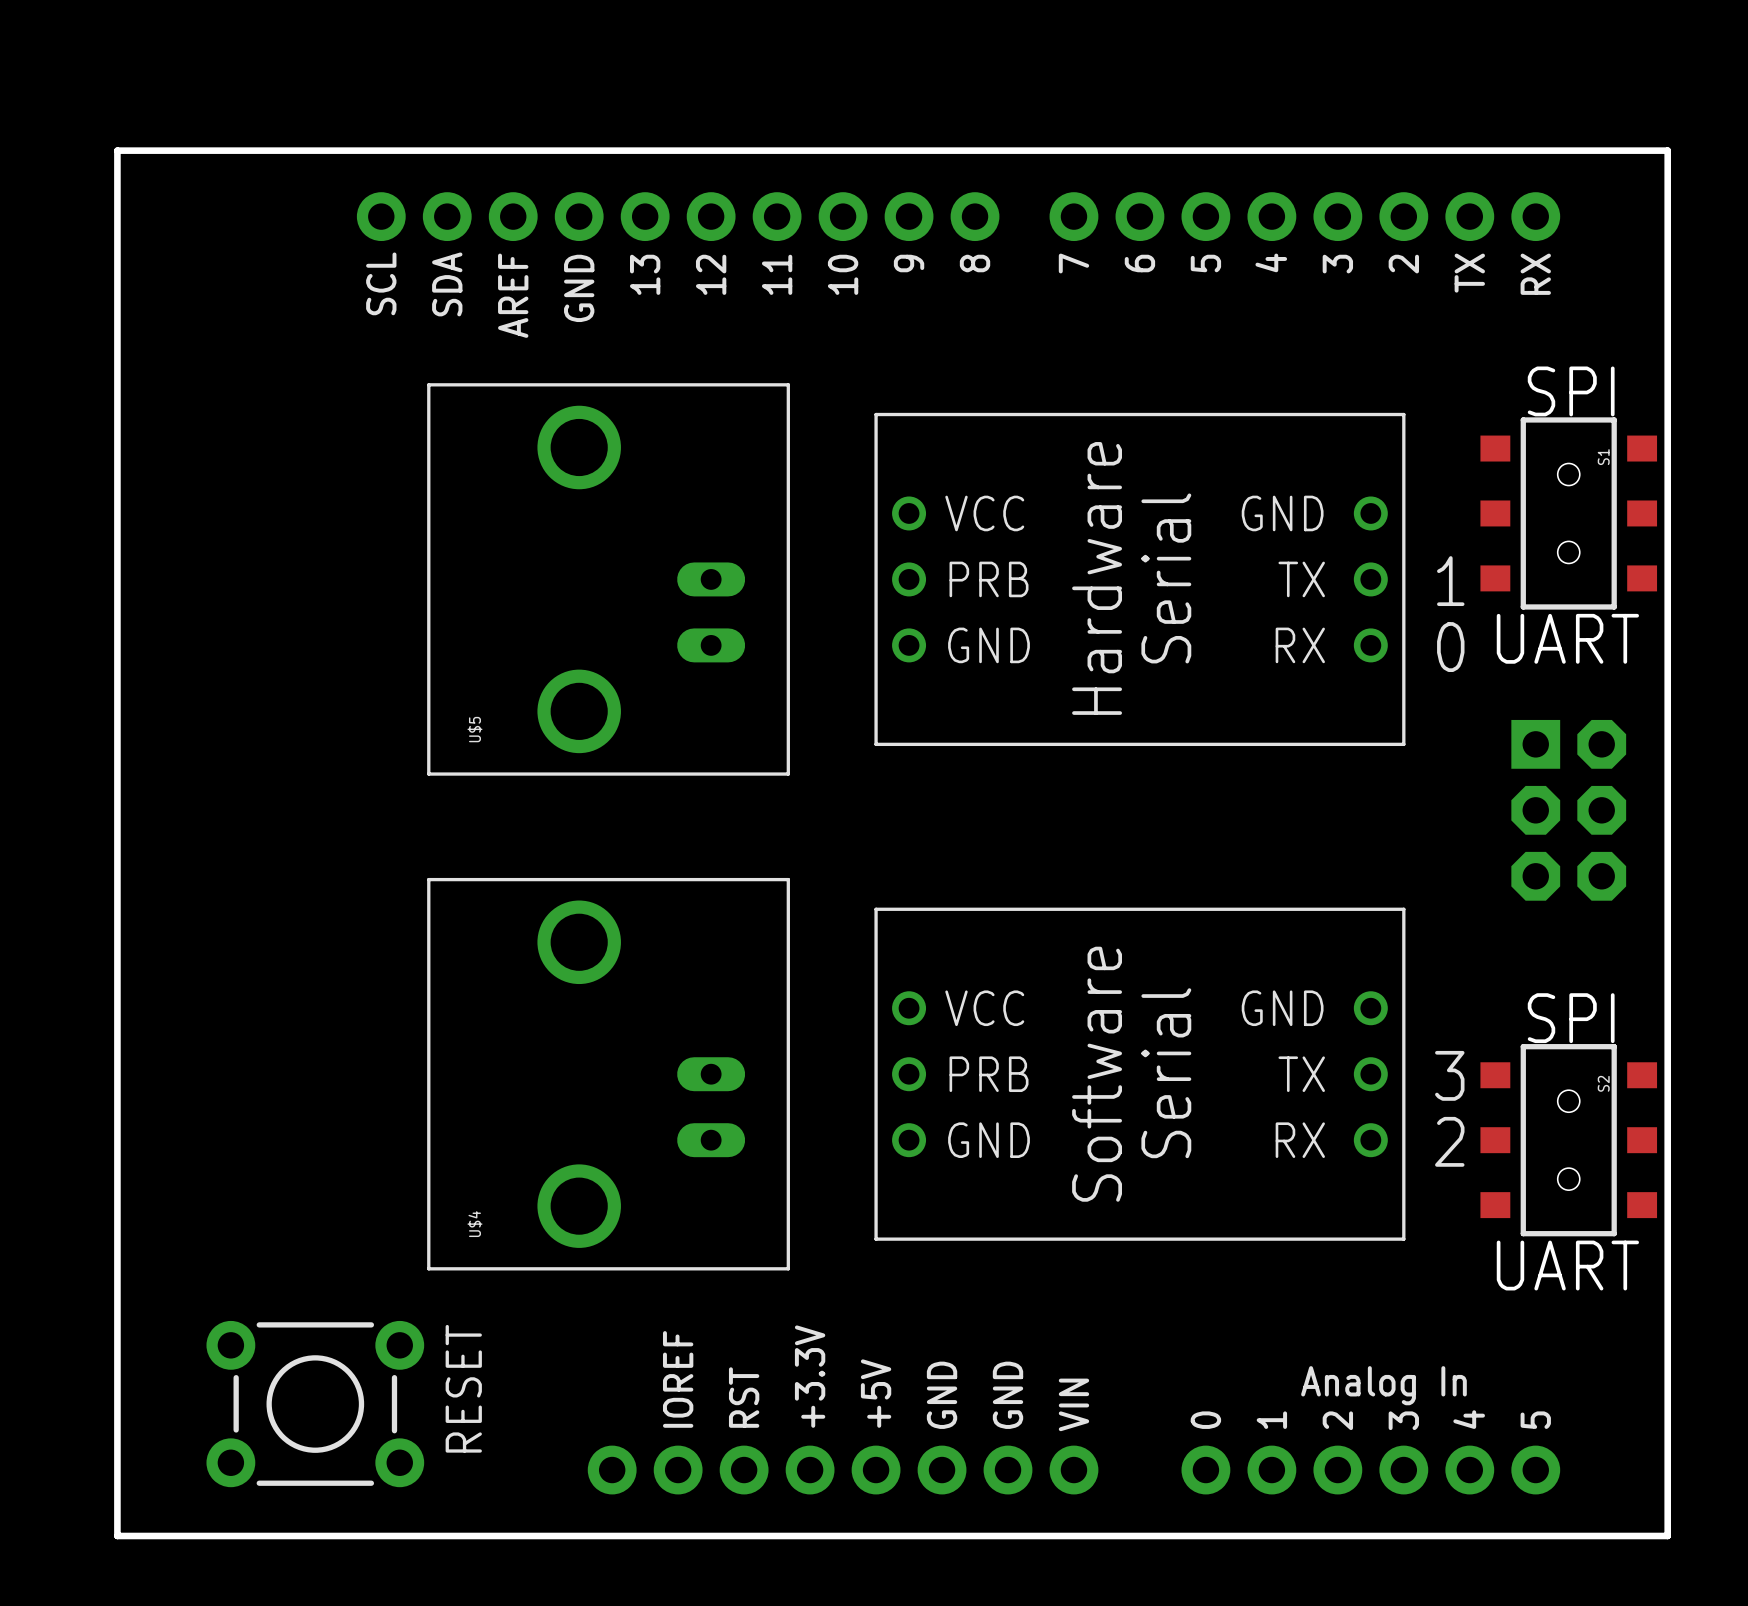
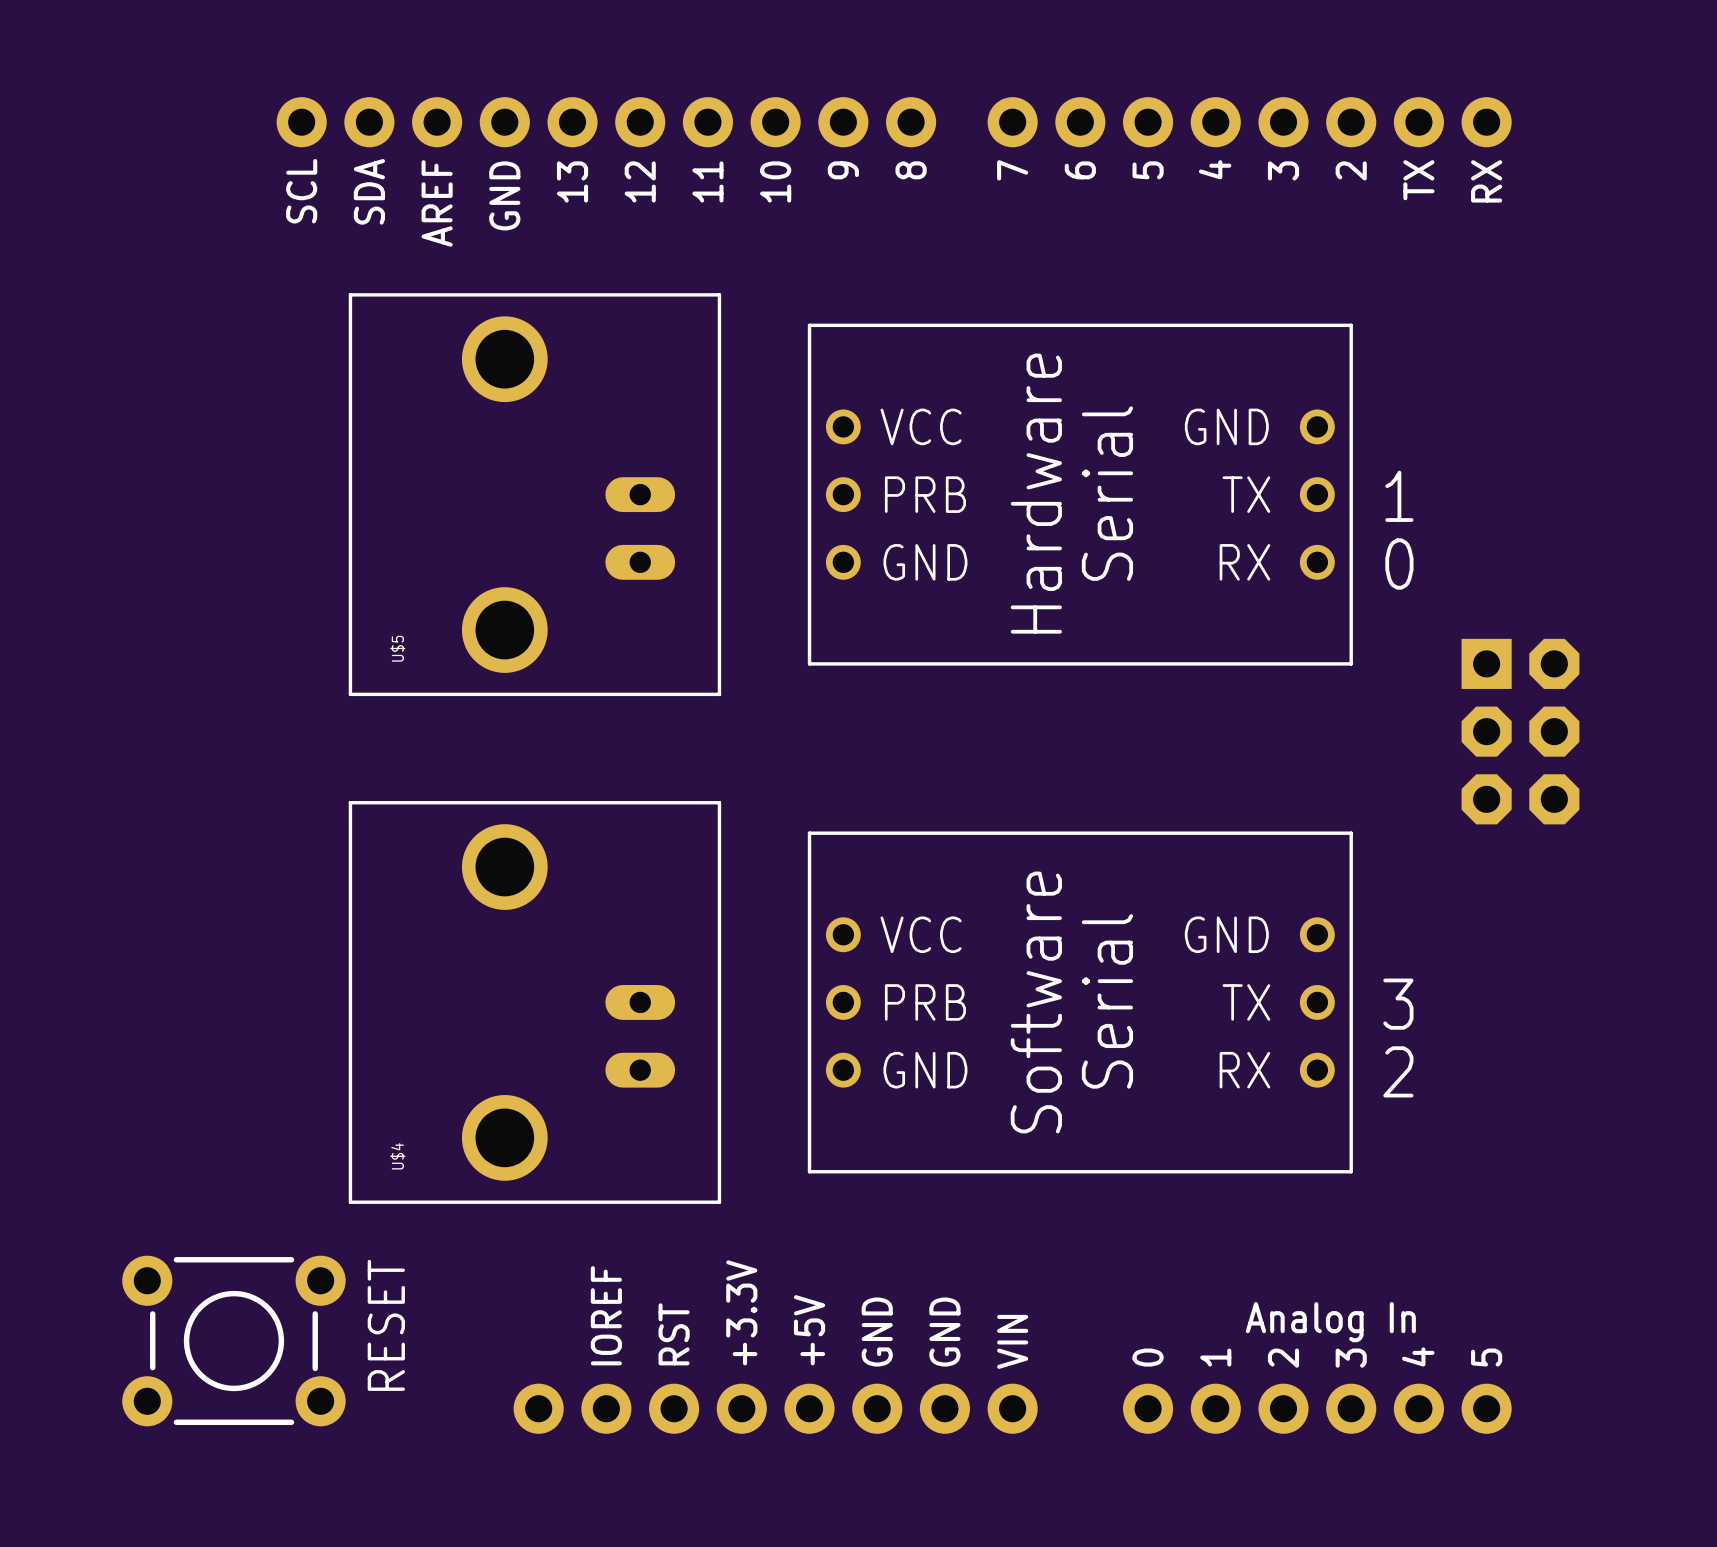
board edge: (117, 150) (1667, 150) (1667, 1535) (117, 1535) (117, 150) -> none
text: SPI (1571, 391) -> none
S1: (1568, 513) -> none
text: UART (1567, 638) -> none
text: SPI (1571, 1018) -> none
S2: (1568, 1140) -> none
text: UART (1567, 1265) -> none

